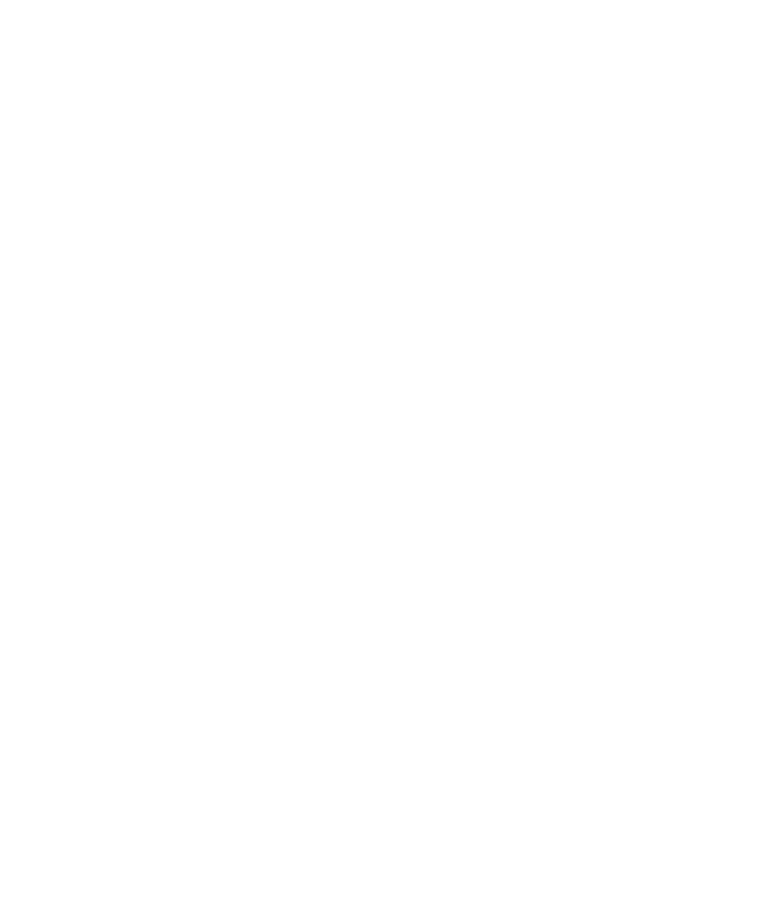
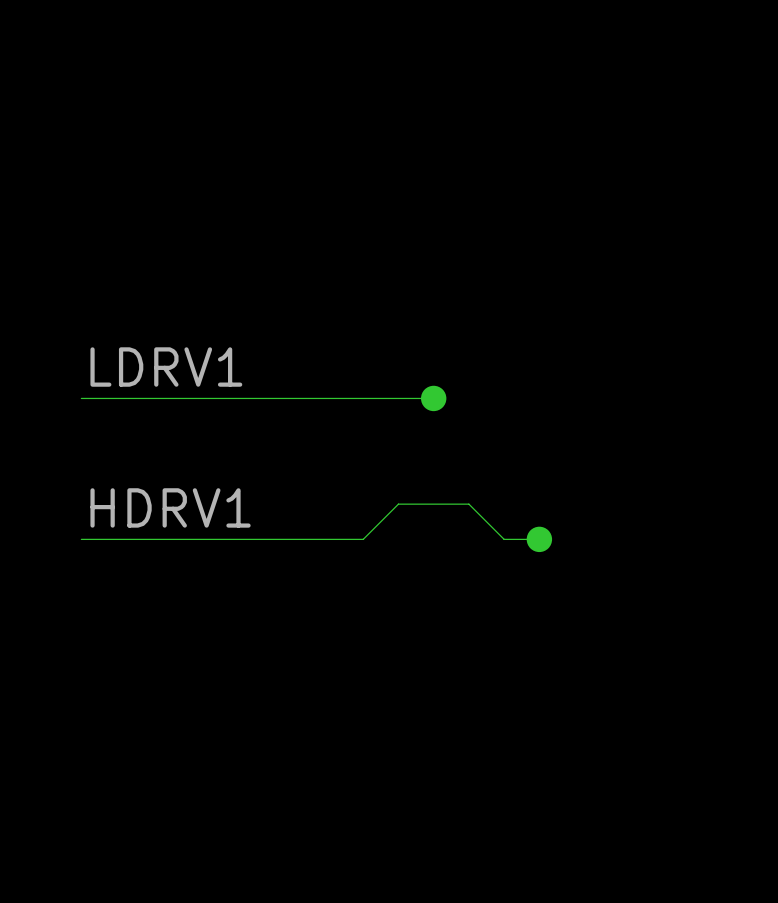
label: none -> LDRV1 (166, 367)
wire: none -> (81, 398) (433, 398)
junction: none -> (433, 398)
label: none -> HDRV1 (170, 507)
wire: none -> (81, 539) (363, 539) (398, 504) (468, 504) (504, 539) (539, 539)
junction: none -> (539, 539)

